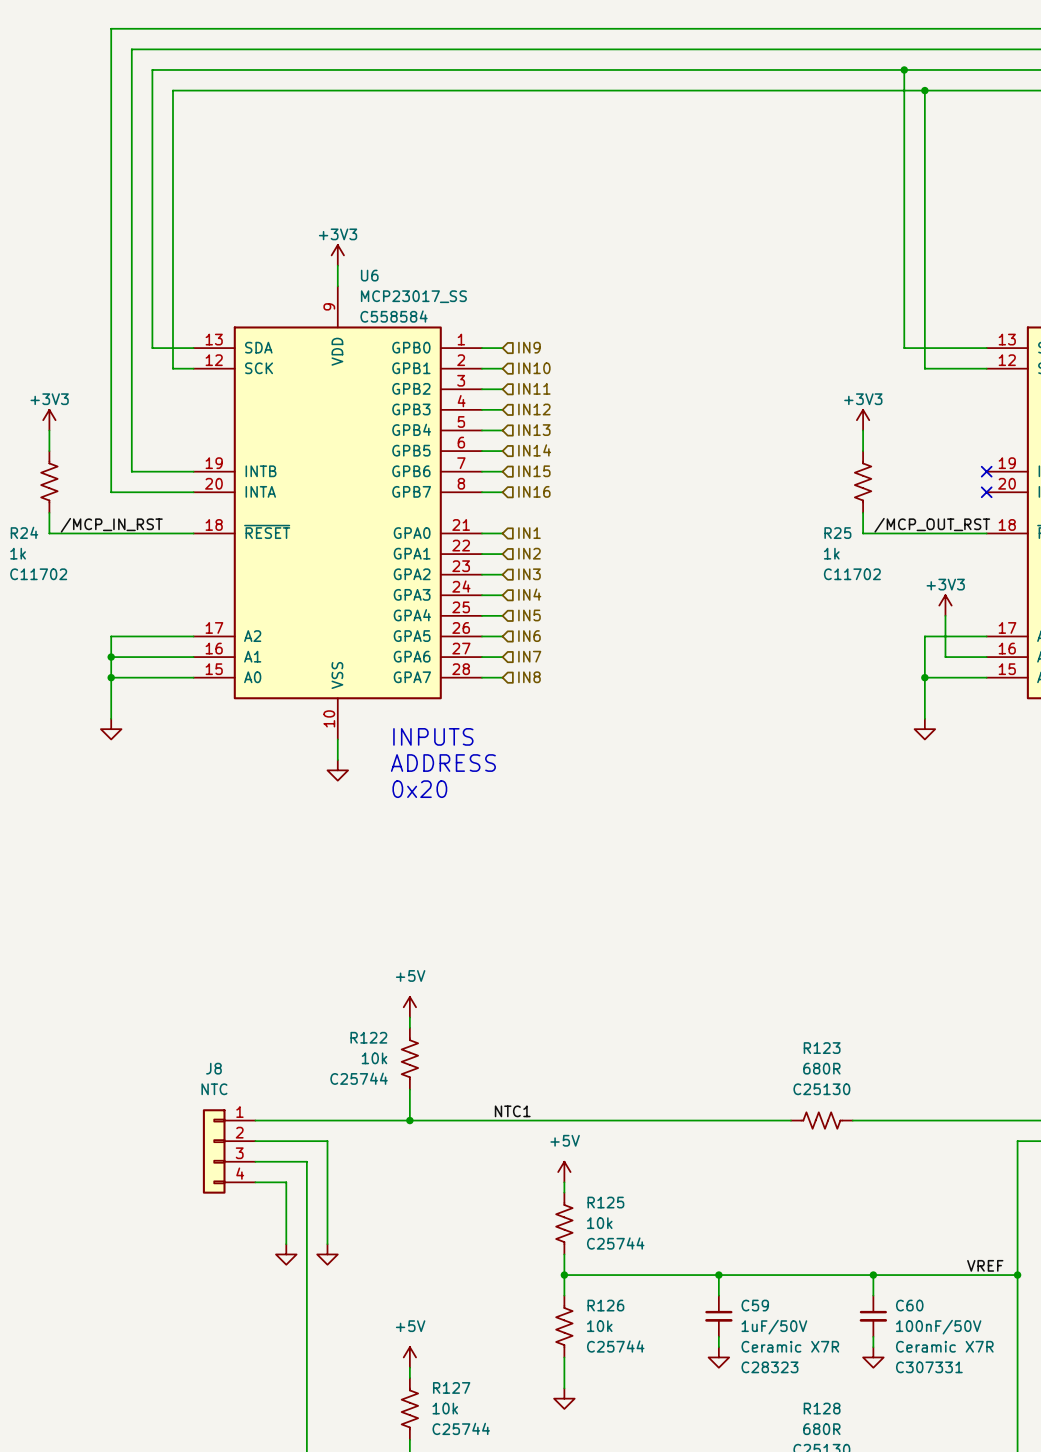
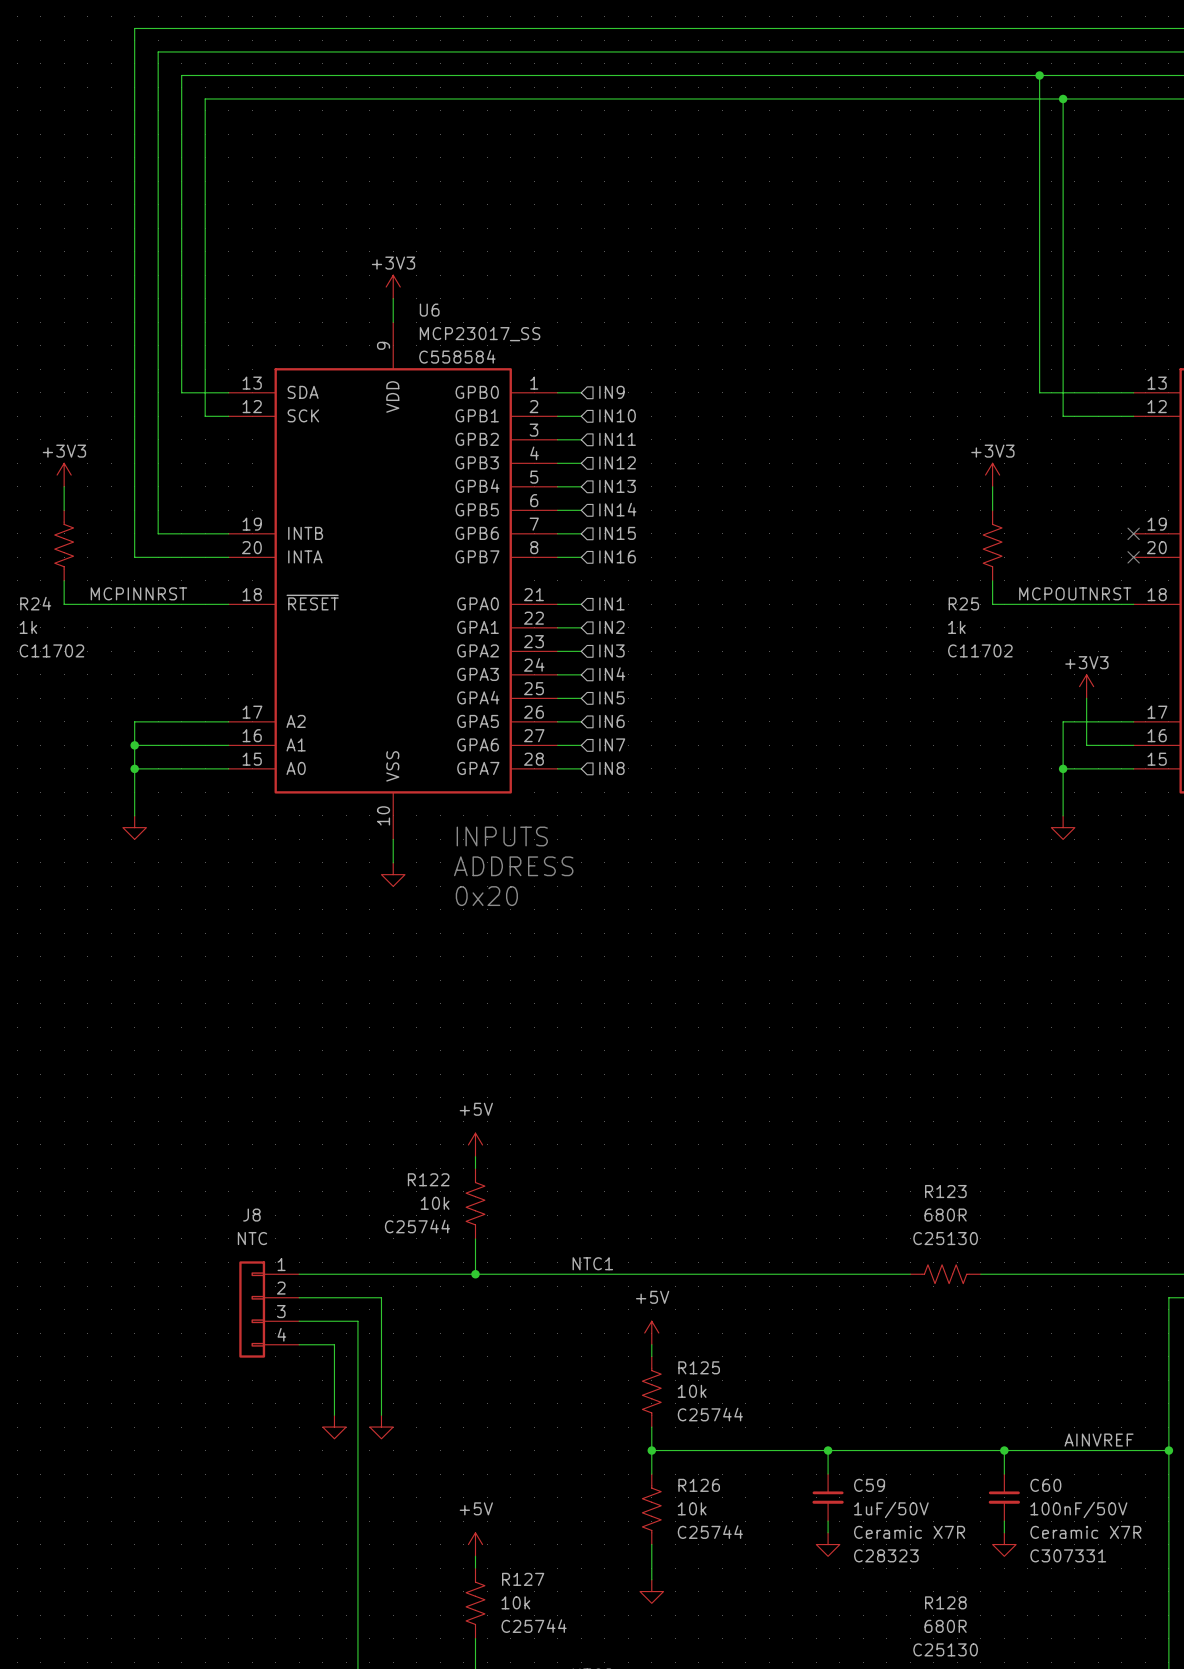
label: /MCP_IN_RST (111, 525) -> MCPINNRST (138, 593)
label: /MCP_OUT_RST (932, 525) -> MCPOUTNRST (1075, 593)
label: VREF (985, 1265) -> AINVREF (1099, 1440)

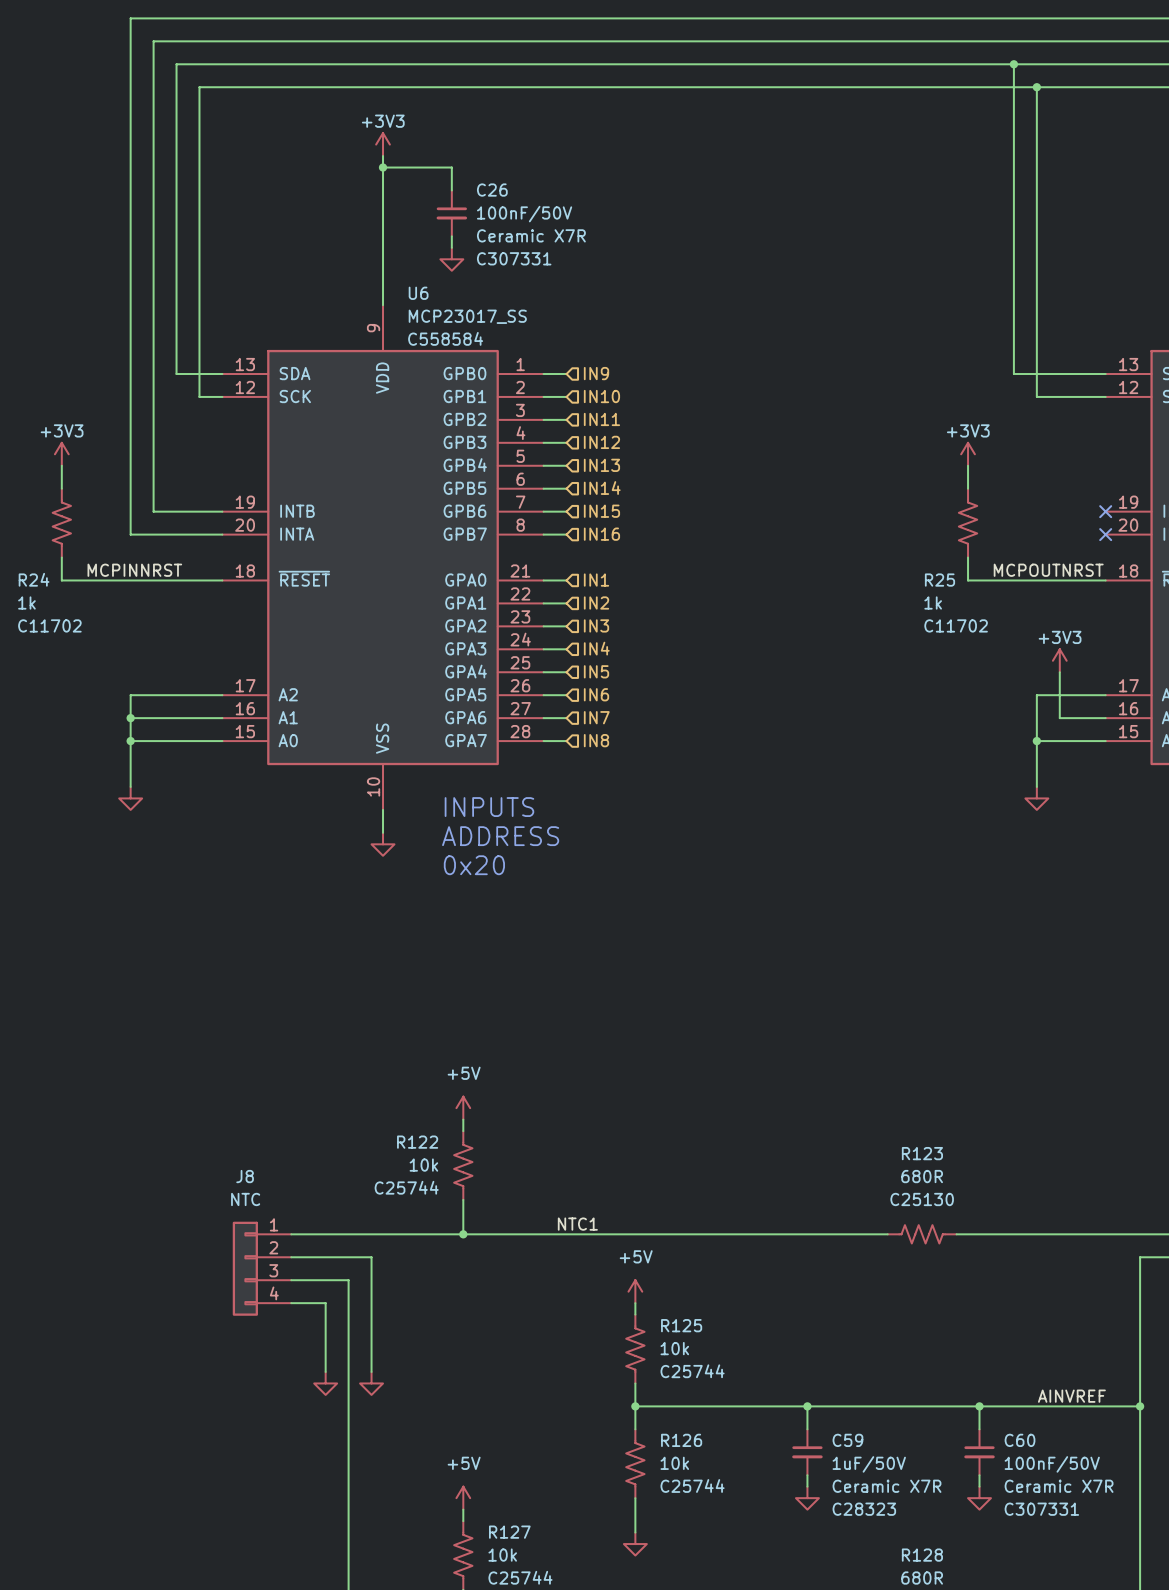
wire: none -> (383, 156) (383, 282)
wire: none -> (383, 167) (451, 167) (451, 190)
junction: none -> (383, 167)
C26: none -> 100nF/50V (451, 213)
wire: none -> (451, 236) (451, 247)
power symbol: none -> (451, 259)
power symbol position: +3V3 (393, 287) -> +3V3 (383, 144)

